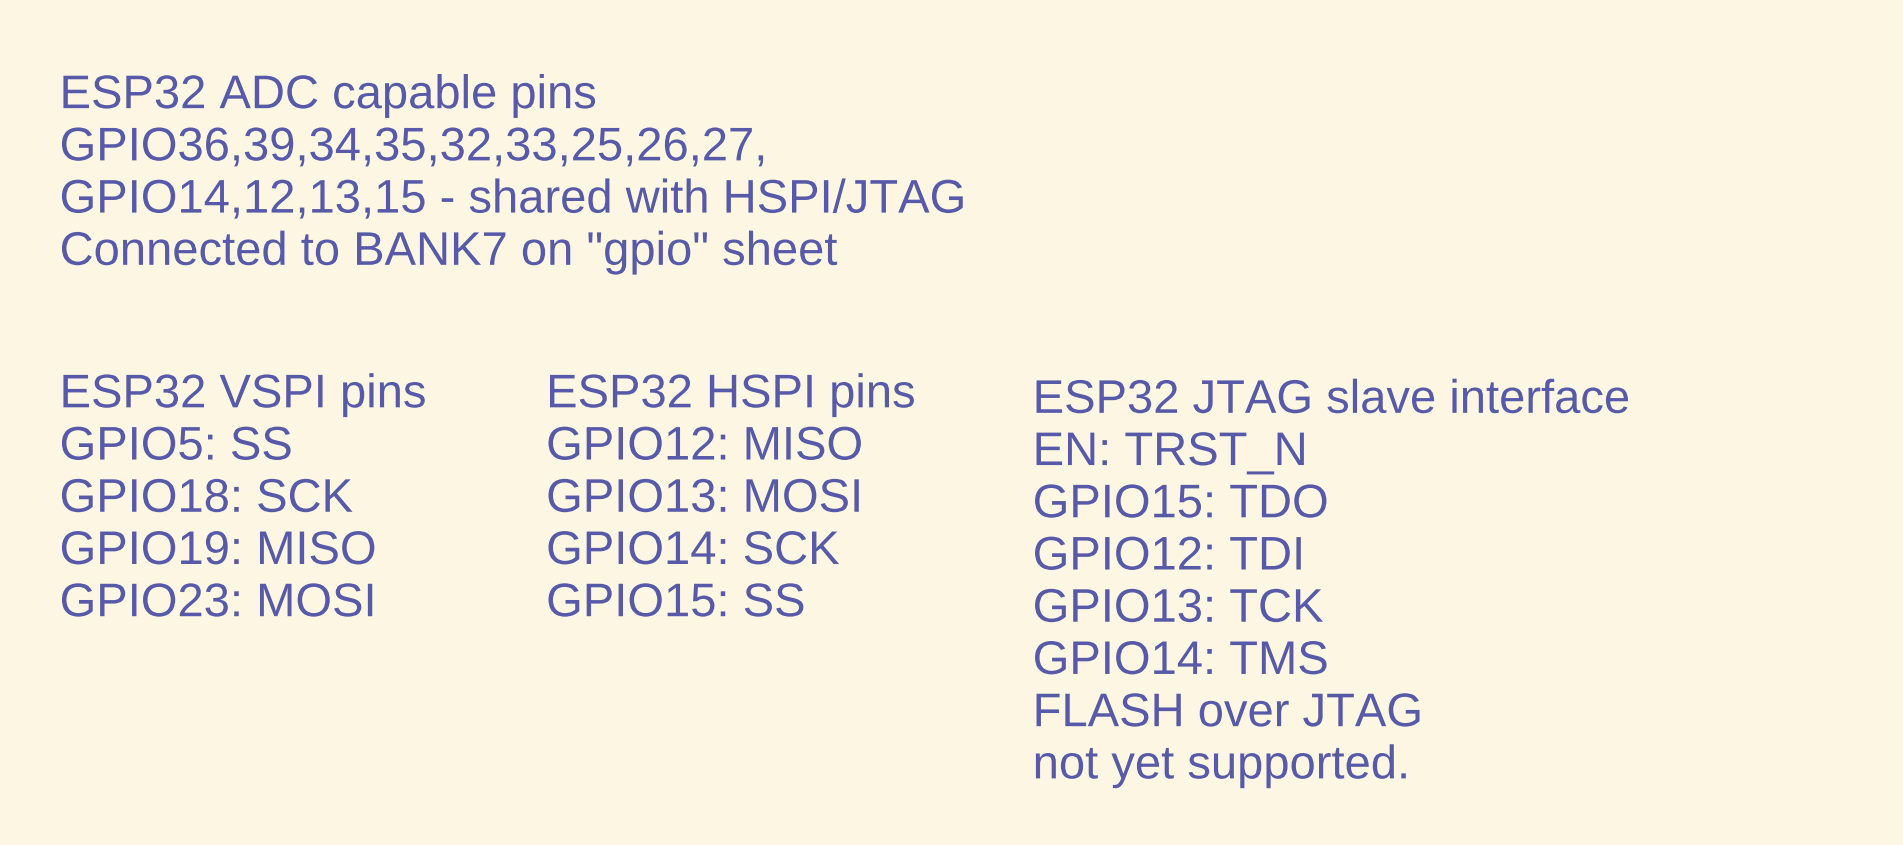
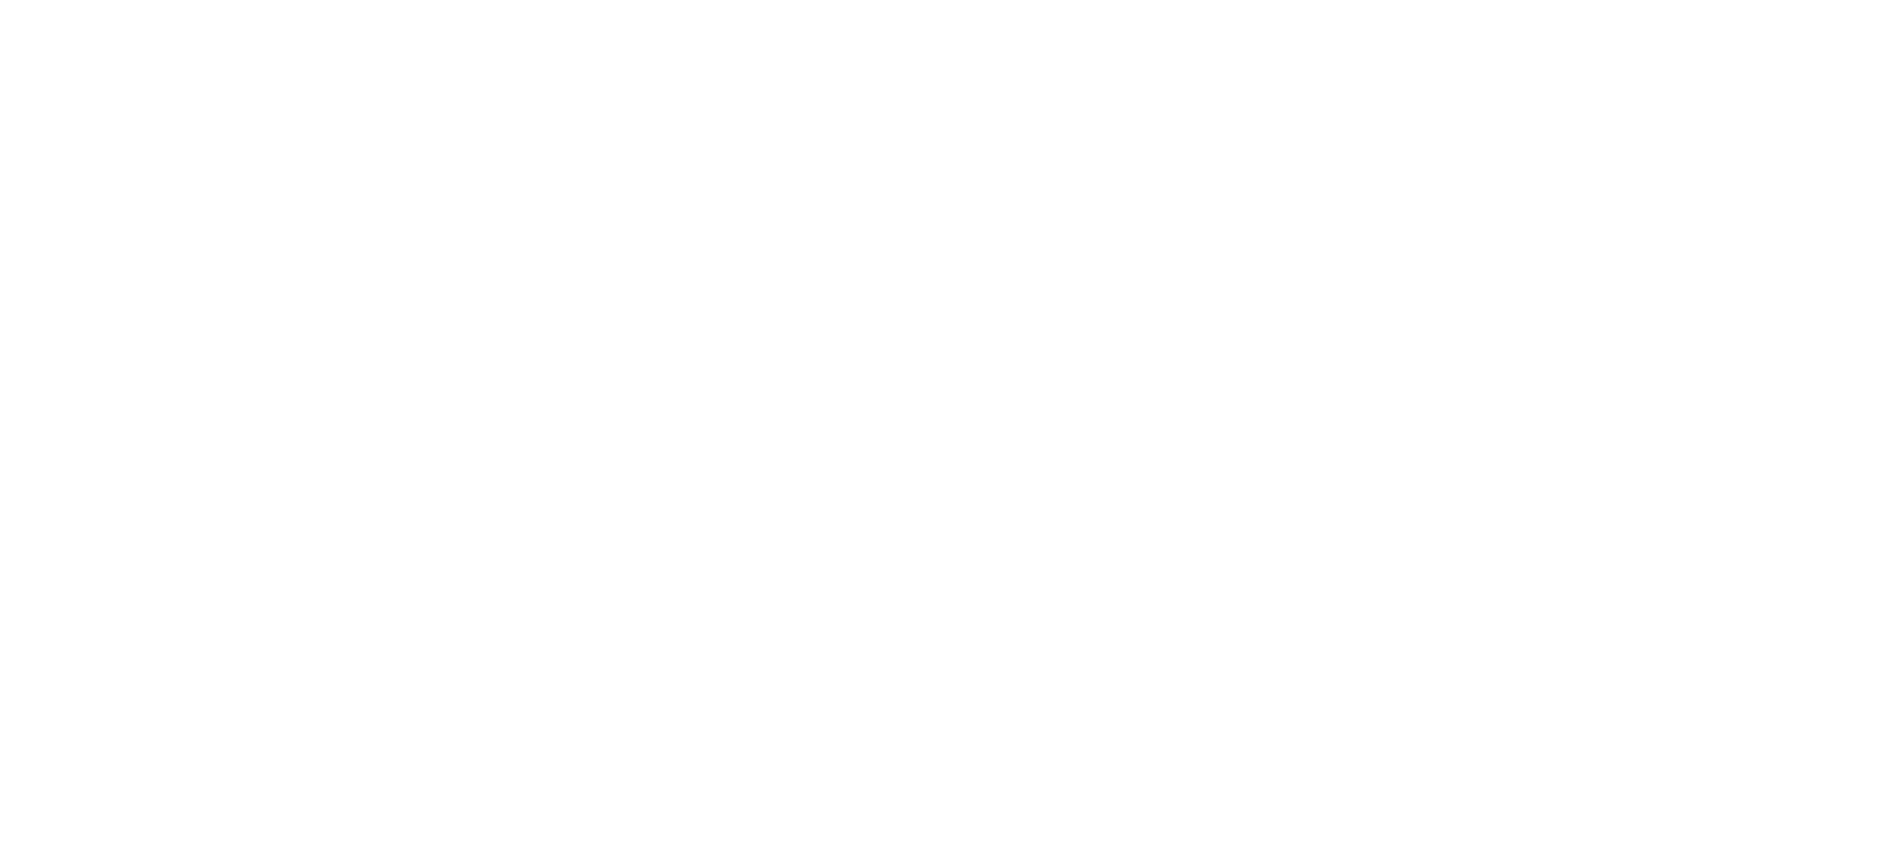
text: ESP32 ADC capable pins (329, 95) -> none
text: GPIO36,39,34,35,32,33,25,26,27, (412, 146) -> none
text: GPIO14,12,13,15 - shared with HSPI/JTAG (512, 198) -> none
text: Connected to BANK7 on "gpio" sheet (449, 252) -> none
text: ESP32 VSPI pins (244, 395) -> none
text: ESP32 HSPI pins (731, 395) -> none
text: ESP32 JTAG slave interface (1332, 395) -> none
text: GPIO5: SS (176, 443) -> none
text: GPIO12: MISO (704, 443) -> none
text: EN: TRST_N (1170, 453) -> none
text: GPIO18: SCK (207, 495) -> none
text: GPIO13: MOSI (703, 495) -> none
text: GPIO15: TDO (1180, 501) -> none
text: GPIO19: MISO (218, 547) -> none
text: GPIO14: SCK (693, 547) -> none
text: GPIO12: TDI (1167, 553) -> none
text: GPIO23: MOSI (217, 599) -> none
text: GPIO15: SS (675, 599) -> none
text: GPIO13: TCK (1179, 605) -> none
text: GPIO14: TMS (1180, 657) -> none
text: FLASH over JTAG (1228, 709) -> none
text: not yet supported. (1220, 766) -> none

